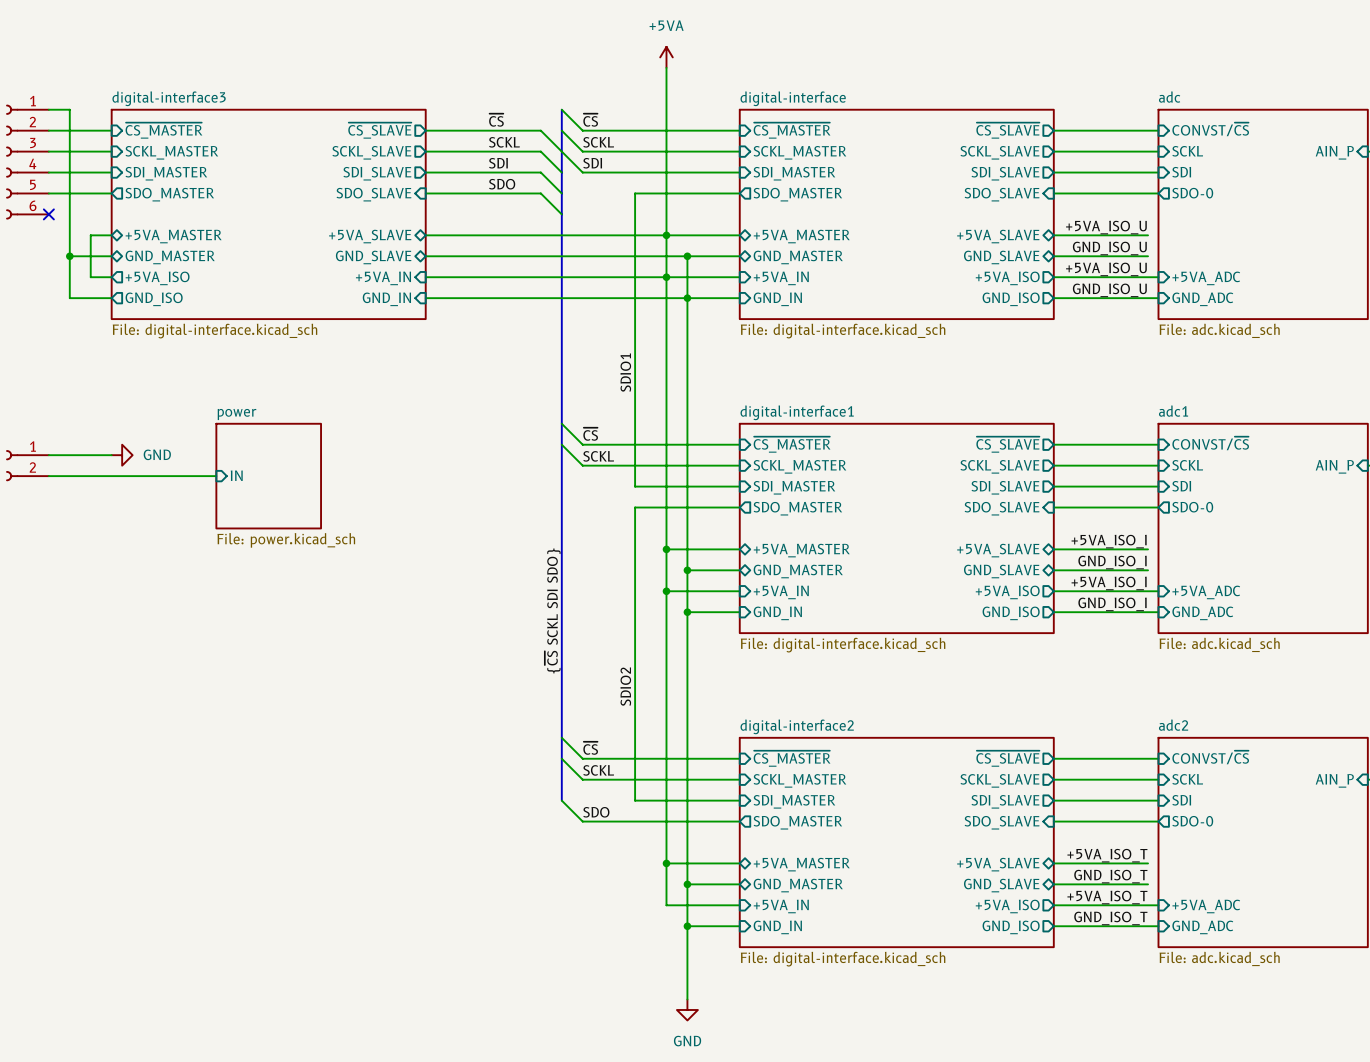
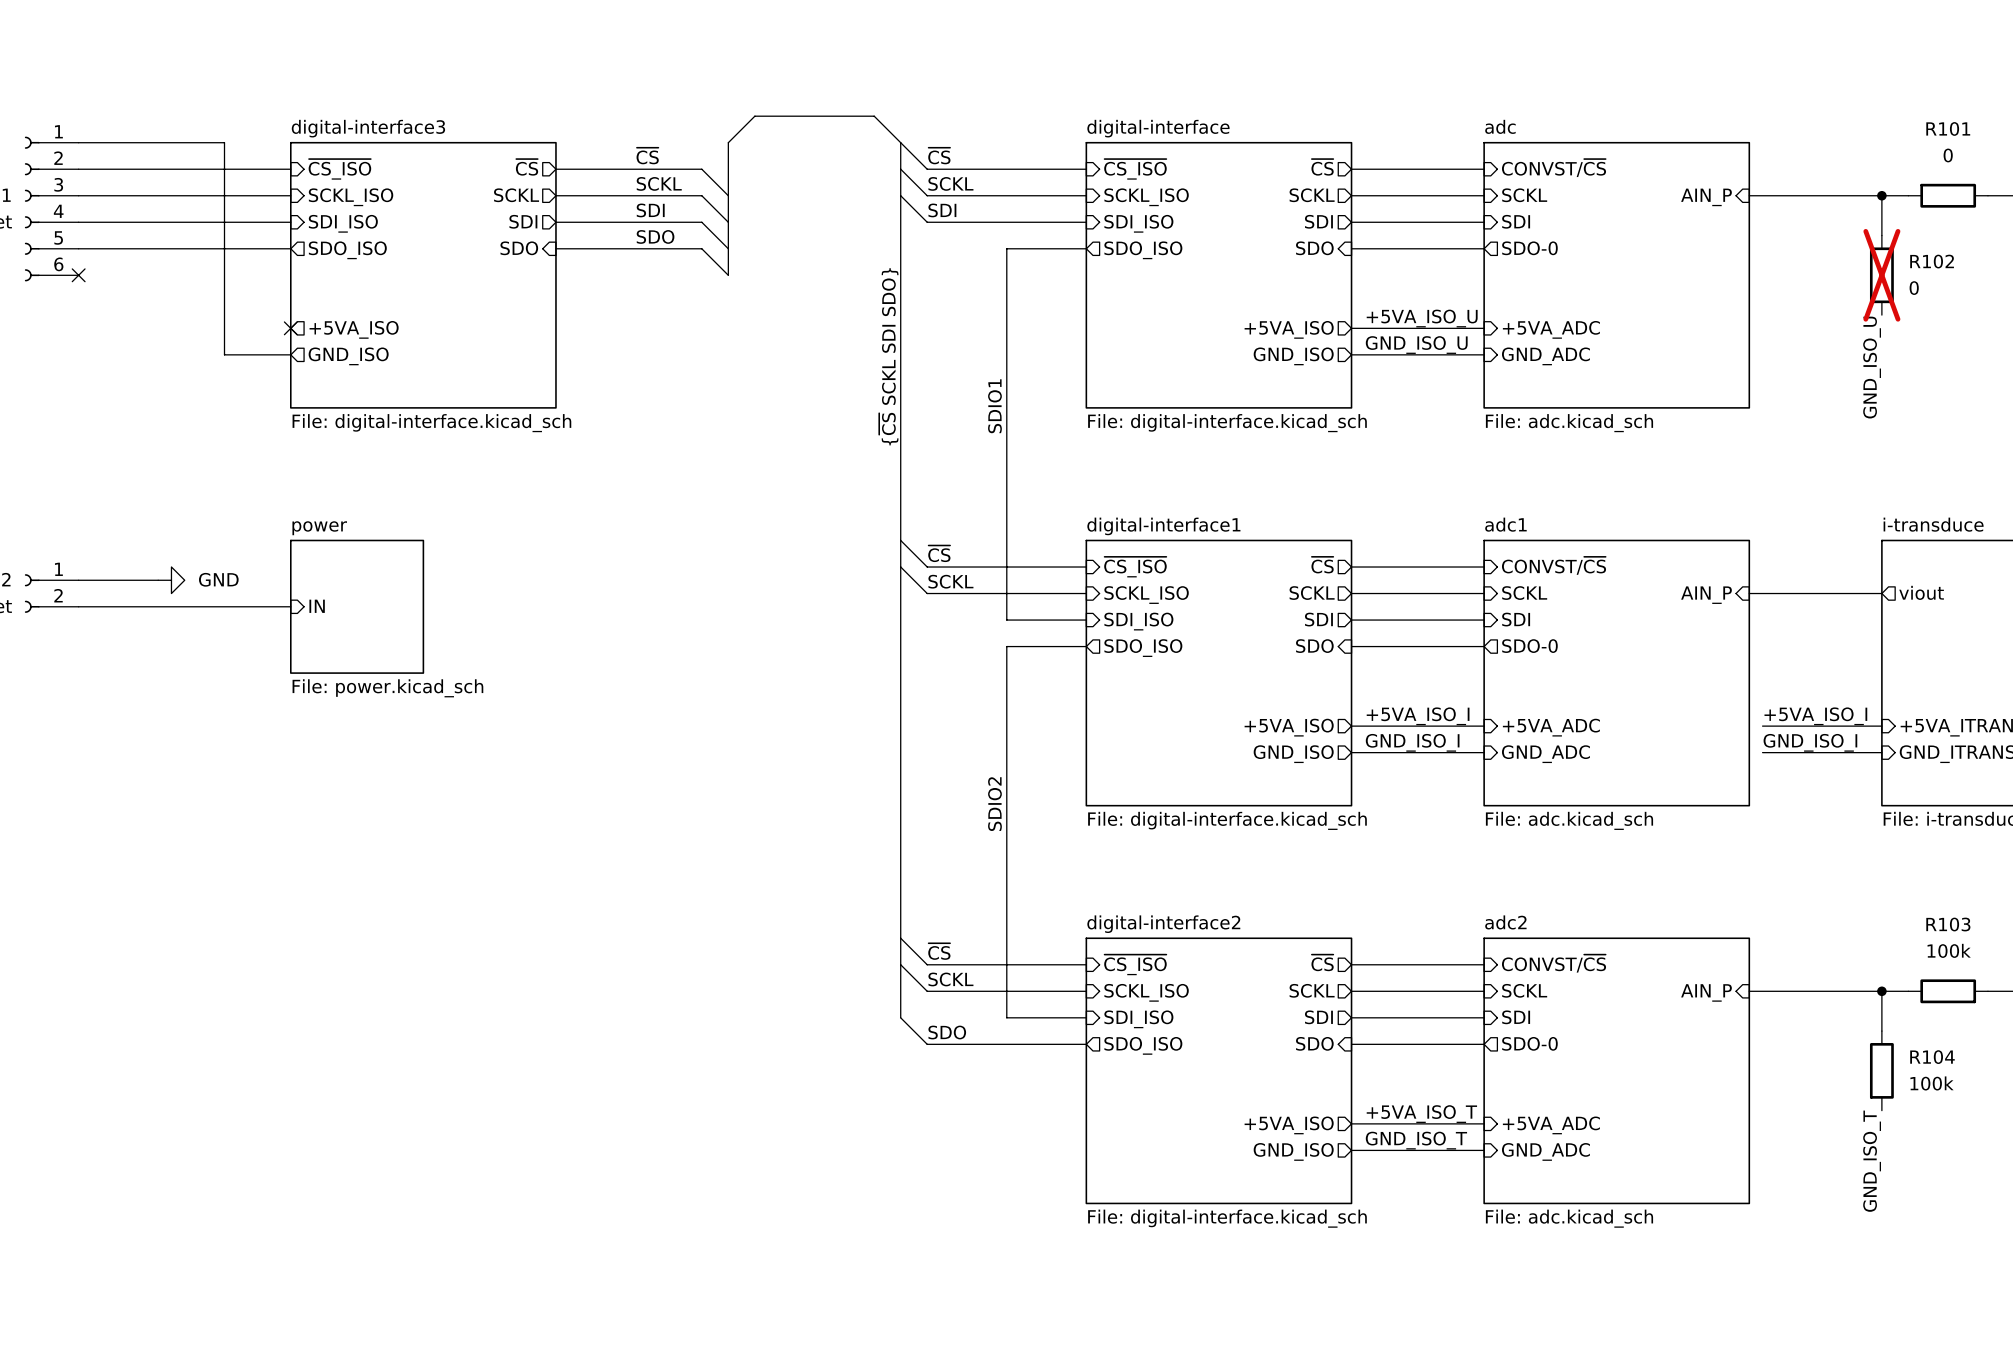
power symbol: +5VA (666, 57) -> none
wire: (666, 67) (666, 905) (739, 905) -> none
sheet digital-interface3 name position: digital-interface3 (169, 98) -> digital-interface3 (368, 128)
wire: (69, 109) (69, 298) (111, 298) -> (105, 142) (224, 142) (224, 354) (290, 354)
sheet digital-interface3 shape: [111, 109, 427, 320] -> [290, 141, 557, 409]
wire: (561, 109) (582, 130) (718, 130) -> (900, 142) (927, 169)
bus: none -> (728, 142) (754, 116) (874, 116) (900, 142) (900, 1017)
label position: ~{CS} (590, 120) -> ~{CS} (939, 156)
wire: none -> (158, 169) (290, 169)
sheet pin: ~{CS_MASTER} (163, 130) -> ~{CS_ISO} (339, 169)
sheet pin: ~{CS_SLAVE} (379, 130) -> ~{CS} (527, 167)
wire: (561, 130) (582, 151) (718, 151) -> (900, 169) (927, 195)
wire: none -> (953, 169) (1086, 169)
sheet pin: ~{CS_MASTER} (792, 130) -> ~{CS_ISO} (1135, 169)
sheet pin: ~{CS_SLAVE} (1007, 130) -> ~{CS} (1322, 167)
label position: SCKL (598, 142) -> SCKL (950, 183)
wire: none -> (158, 195) (290, 195)
wire: (561, 151) (582, 172) (718, 172) -> (900, 195) (927, 222)
wire: none -> (953, 195) (1086, 195)
sheet pin: SCKL_MASTER (171, 152) -> SCKL_ISO (351, 197)
sheet pin: SCKL_SLAVE (371, 152) -> SCKL (516, 195)
sheet pin: SCKL_MASTER (799, 152) -> SCKL_ISO (1146, 197)
sheet pin: SCKL_SLAVE (999, 152) -> SCKL (1312, 195)
label position: SDI (592, 163) -> SDI (942, 210)
wire: none -> (158, 222) (290, 222)
wire: none -> (953, 222) (1086, 222)
sheet pin: SDI_MASTER (166, 173) -> none
sheet pin: none -> SDI_ISO (343, 223)
sheet pin: SDI_SLAVE (377, 173) -> SDI (523, 221)
sheet pin: SDI_MASTER (794, 173) -> none
sheet pin: none -> SDI_ISO (1138, 223)
sheet pin: SDI_SLAVE (1005, 173) -> SDI (1318, 221)
wire: none -> (158, 248) (290, 248)
wire: (739, 193) (635, 193) (635, 486) (739, 486) -> none
wire: none -> (1086, 248) (1006, 248) (1006, 620) (1086, 620)
sheet pin: SDO_MASTER (169, 194) -> none
sheet pin: none -> SDO_ISO (347, 250)
sheet pin: SDO_SLAVE (373, 194) -> SDO (519, 248)
sheet pin: SDO_MASTER (797, 194) -> none
sheet pin: none -> SDO_ISO (1143, 250)
sheet pin: SDO_SLAVE (1002, 194) -> SDO (1314, 248)
bus: (561, 214) (561, 800) -> none
sheet digital-interface: File: digital-interface.kicad_sch (896, 214) -> none
sheet digital-interface: none -> File: digital-interface.kicad_sch (1218, 275)
label: +5VA_ISO_U (1106, 227) -> none
wire: (111, 235) (90, 235) (90, 277) (111, 277) -> none
wire: (425, 235) (739, 235) -> none
junction: (666, 235) -> none
wire: (1053, 235) (1148, 235) -> none
sheet pin: +5VA_MASTER (173, 236) -> none
sheet pin: +5VA_SLAVE (370, 236) -> none
sheet pin: +5VA_MASTER (801, 236) -> none
sheet pin: +5VA_SLAVE (998, 236) -> none
label: none -> +5VA_ISO_U (1422, 318)
label: GND_ISO_U (1109, 248) -> none
wire: (69, 256) (111, 256) -> none
junction: (69, 256) -> none
no-connect mark: none -> (290, 328)
wire: (425, 256) (739, 256) -> none
wire: (687, 256) (687, 999) -> none
junction: (687, 256) -> none
wire: none -> (1470, 328) (1484, 328)
sheet pin: GND_MASTER (170, 257) -> none
sheet pin: GND_SLAVE (373, 257) -> none
sheet pin: GND_MASTER (798, 257) -> none
sheet pin shape: bidirectional (1001, 257) -> output (1289, 329)
sheet pin: GND_SLAVE (1001, 257) -> +5VA_ISO (1289, 329)
sheet pin: none -> +5VA_ADC (1551, 329)
label: none -> GND_ISO_U (1416, 345)
label: +5VA_ISO_U (1106, 269) -> none
wire: (425, 277) (739, 277) -> none
junction: (666, 277) -> none
sheet pin position: +5VA_ISO (157, 278) -> +5VA_ISO (354, 329)
sheet pin: +5VA_IN (383, 278) -> none
sheet pin: +5VA_IN (781, 278) -> none
sheet pin: +5VA_ISO (1007, 278) -> GND_ISO (1293, 356)
sheet pin: +5VA_ADC (1206, 278) -> GND_ADC (1545, 356)
label: none -> {~{CS} SCKL SDI SDO} (888, 356)
label: GND_ISO_U (1109, 290) -> none
wire: (425, 298) (739, 298) -> none
junction: (687, 298) -> none
wire: (1053, 298) (1158, 298) -> none
sheet pin position: GND_ISO (154, 299) -> GND_ISO (348, 356)
sheet pin: GND_IN (386, 299) -> none
sheet pin: GND_IN (777, 299) -> none
sheet pin: GND_ISO (1011, 299) -> none
sheet pin: GND_ADC (1202, 299) -> none
sheet digital-interface3 value position: File: digital-interface.kicad_sch (215, 331) -> File: digital-interface.kicad_sch (431, 423)
label position: SDIO1 (625, 372) -> SDIO1 (994, 406)
sheet digital-interface1 name position: digital-interface1 (797, 412) -> digital-interface1 (1163, 526)
wire: (561, 423) (582, 444) (718, 444) -> (900, 540) (927, 567)
sheet digital-interface1 shape: [739, 423, 1055, 634] -> [1085, 539, 1353, 807]
label position: ~{CS} (590, 434) -> ~{CS} (939, 553)
wire: (561, 444) (582, 465) (718, 465) -> (900, 567) (927, 593)
wire: none -> (953, 567) (1086, 567)
sheet pin: ~{CS_MASTER} (792, 444) -> ~{CS_ISO} (1135, 567)
sheet pin: ~{CS_SLAVE} (1007, 444) -> ~{CS} (1322, 565)
label position: SCKL (598, 456) -> SCKL (950, 581)
wire: none -> (953, 593) (1086, 593)
sheet pin: SCKL_MASTER (799, 466) -> SCKL_ISO (1146, 595)
sheet pin: SCKL_SLAVE (999, 466) -> SCKL (1312, 593)
sheet pin: SDI_MASTER (794, 487) -> none
sheet pin: none -> SDI_ISO (1138, 621)
sheet pin: SDI_SLAVE (1005, 487) -> SDI (1318, 619)
wire: (739, 507) (635, 507) (635, 800) (739, 800) -> none
wire: none -> (1086, 646) (1006, 646) (1006, 1017) (1086, 1017)
sheet pin: SDO_MASTER (797, 508) -> none
sheet pin: none -> SDO_ISO (1143, 648)
sheet pin: SDO_SLAVE (1002, 508) -> SDO (1314, 646)
label: +5VA_ISO_I (1109, 541) -> none
wire: (666, 549) (739, 549) -> none
junction: (666, 549) -> none
wire: (1053, 549) (1148, 549) -> none
sheet pin: +5VA_MASTER (801, 550) -> none
sheet pin: +5VA_SLAVE (998, 550) -> none
label: none -> +5VA_ISO_I (1418, 716)
label: GND_ISO_I (1112, 562) -> none
wire: (687, 570) (739, 570) -> none
junction: (687, 570) -> none
wire: none -> (1470, 726) (1484, 726)
sheet pin: GND_MASTER (798, 571) -> none
sheet pin shape: bidirectional (1001, 571) -> output (1289, 727)
sheet pin: GND_SLAVE (1001, 571) -> +5VA_ISO (1289, 727)
sheet pin: none -> +5VA_ADC (1551, 727)
label: none -> GND_ISO_I (1412, 742)
label: +5VA_ISO_I (1109, 583) -> none
wire: (666, 591) (739, 591) -> none
junction: (666, 591) -> none
sheet pin: +5VA_IN (781, 592) -> none
sheet pin: +5VA_ISO (1007, 592) -> GND_ISO (1293, 754)
sheet pin: +5VA_ADC (1206, 592) -> GND_ADC (1545, 754)
label: GND_ISO_I (1112, 604) -> none
label: {~{CS} SCKL SDI SDO} (552, 610) -> none
wire: (687, 612) (739, 612) -> none
junction: (687, 612) -> none
wire: (1053, 612) (1158, 612) -> none
sheet pin: GND_IN (777, 613) -> none
sheet pin: GND_ISO (1011, 613) -> none
sheet pin: GND_ADC (1202, 613) -> none
sheet digital-interface1 value position: File: digital-interface.kicad_sch (843, 645) -> File: digital-interface.kicad_sch (1227, 820)
label position: SDIO2 (625, 686) -> SDIO2 (994, 804)
sheet digital-interface2 name position: digital-interface2 (797, 726) -> digital-interface2 (1163, 924)
wire: (561, 737) (582, 758) (718, 758) -> (900, 938) (927, 964)
sheet digital-interface2 shape: [739, 737, 1055, 948] -> [1085, 937, 1353, 1205]
label position: ~{CS} (590, 748) -> ~{CS} (939, 951)
wire: (561, 758) (582, 779) (718, 779) -> (900, 964) (927, 991)
wire: none -> (953, 964) (1086, 964)
sheet pin: ~{CS_MASTER} (792, 758) -> ~{CS_ISO} (1135, 964)
sheet pin: ~{CS_SLAVE} (1007, 758) -> ~{CS} (1322, 962)
label position: SCKL (598, 770) -> SCKL (950, 979)
wire: none -> (953, 991) (1086, 991)
sheet pin: SCKL_MASTER (799, 780) -> SCKL_ISO (1146, 992)
sheet pin: SCKL_SLAVE (999, 780) -> SCKL (1312, 990)
wire: (561, 800) (582, 821) (718, 821) -> (900, 1017) (927, 1044)
sheet pin: SDI_MASTER (794, 801) -> none
sheet pin: none -> SDI_ISO (1138, 1019)
sheet pin: SDI_SLAVE (1005, 801) -> SDI (1318, 1017)
label position: SDO (596, 812) -> SDO (947, 1032)
wire: none -> (953, 1044) (1086, 1044)
sheet pin: SDO_MASTER (797, 822) -> none
sheet pin: none -> SDO_ISO (1143, 1045)
sheet pin: SDO_SLAVE (1002, 822) -> SDO (1314, 1043)
label: +5VA_ISO_T (1107, 855) -> none
wire: (666, 863) (739, 863) -> none
junction: (666, 863) -> none
wire: (1053, 863) (1148, 863) -> none
sheet pin: +5VA_MASTER (801, 864) -> none
sheet pin: +5VA_SLAVE (998, 864) -> none
label: none -> +5VA_ISO_T (1421, 1114)
label: GND_ISO_T (1110, 876) -> none
wire: (687, 884) (739, 884) -> none
junction: (687, 884) -> none
wire: none -> (1470, 1123) (1484, 1123)
sheet pin: GND_MASTER (798, 885) -> none
sheet pin shape: bidirectional (1001, 885) -> output (1289, 1125)
sheet pin: GND_SLAVE (1001, 885) -> +5VA_ISO (1289, 1125)
sheet pin: none -> +5VA_ADC (1551, 1125)
label: none -> GND_ISO_T (1416, 1140)
label: +5VA_ISO_T (1107, 897) -> none
sheet pin: +5VA_IN (781, 906) -> none
sheet pin: +5VA_ISO (1007, 906) -> GND_ISO (1293, 1151)
sheet pin: +5VA_ADC (1206, 906) -> GND_ADC (1545, 1151)
label: GND_ISO_T (1110, 918) -> none
wire: (687, 926) (739, 926) -> none
junction: (687, 926) -> none
wire: (1053, 926) (1158, 926) -> none
sheet pin: GND_IN (777, 927) -> none
sheet pin: GND_ISO (1011, 927) -> none
sheet pin: GND_ADC (1202, 927) -> none
sheet digital-interface2 value position: File: digital-interface.kicad_sch (843, 959) -> File: digital-interface.kicad_sch (1227, 1218)
power symbol: GND (687, 1009) -> none

